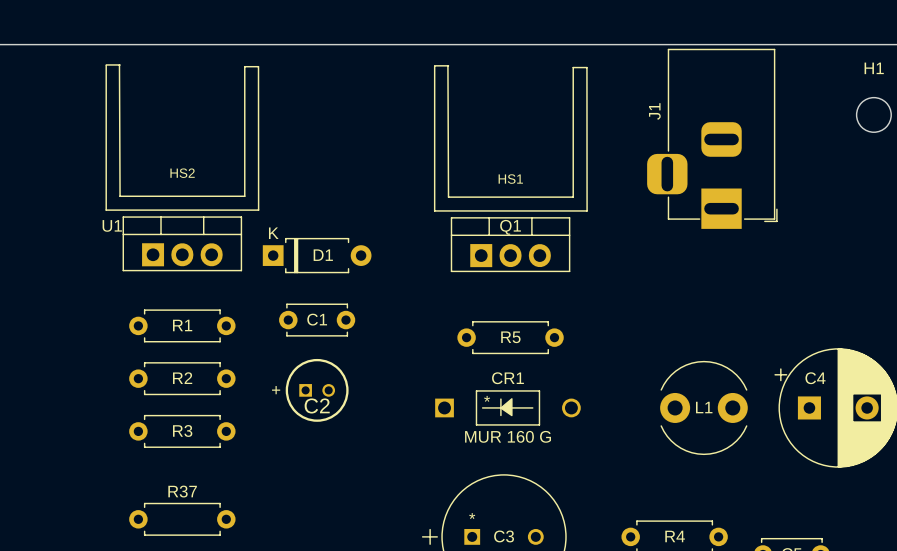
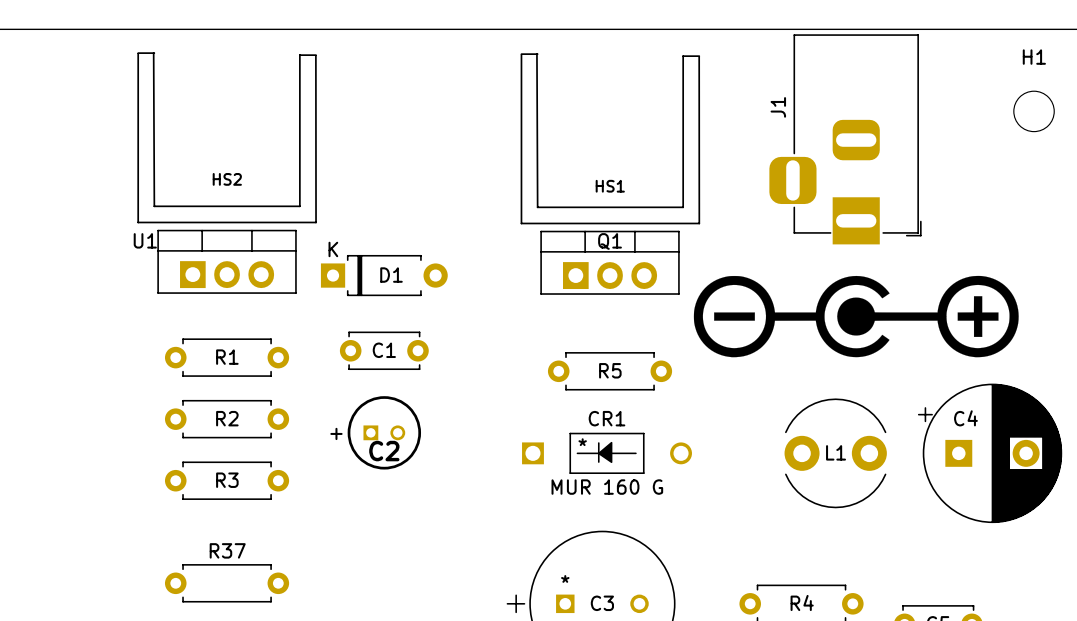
drawing: none -> [693, 275, 1019, 358]

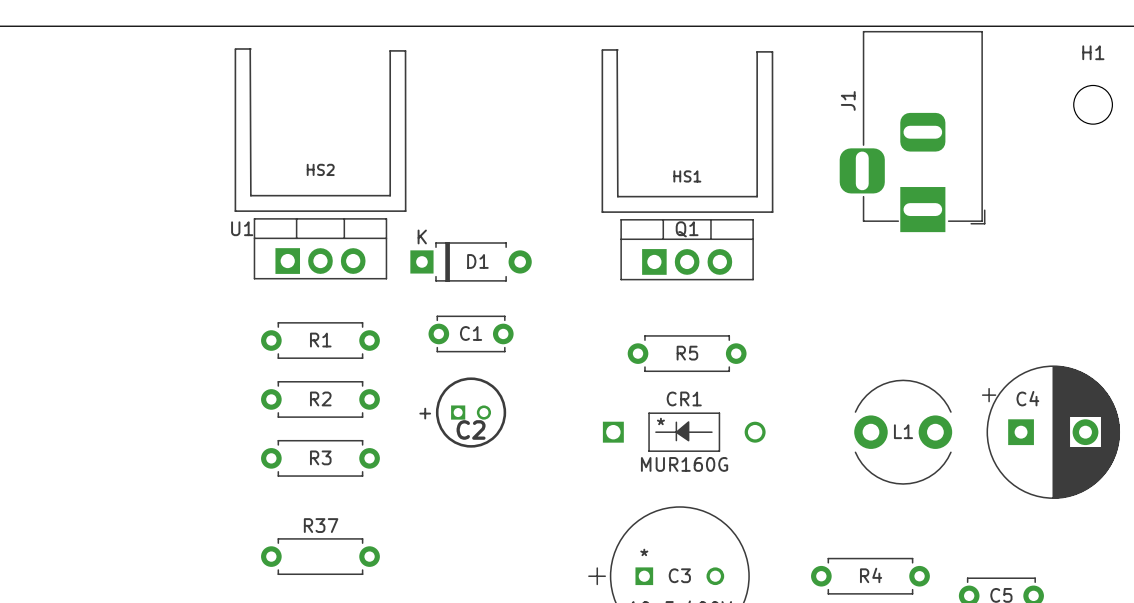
drawing: [693, 275, 1019, 358] -> none
CR1 value: MUR 160 G (607, 487) -> MUR160G (684, 464)

